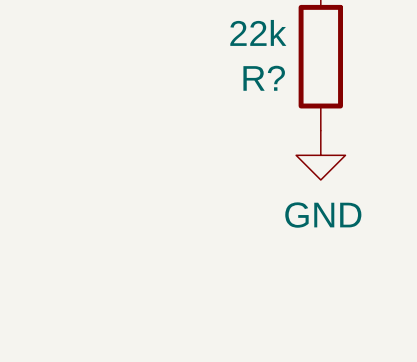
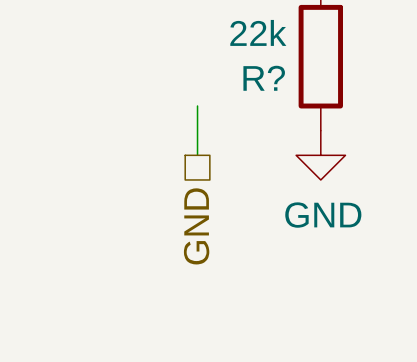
wire: none -> (197, 106) (197, 155)
hierarchical label: none -> GND (196, 226)

